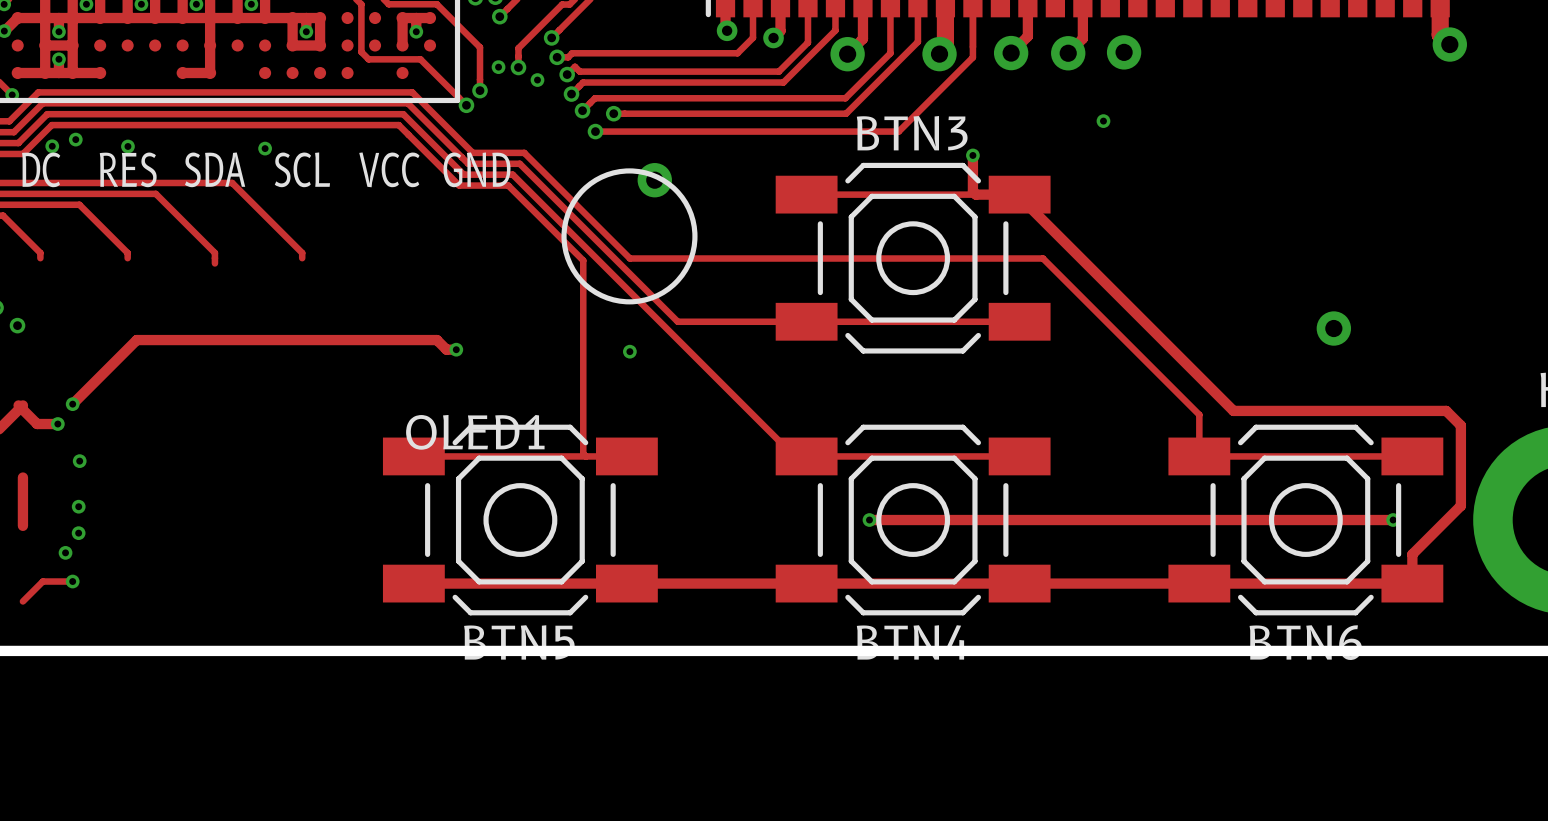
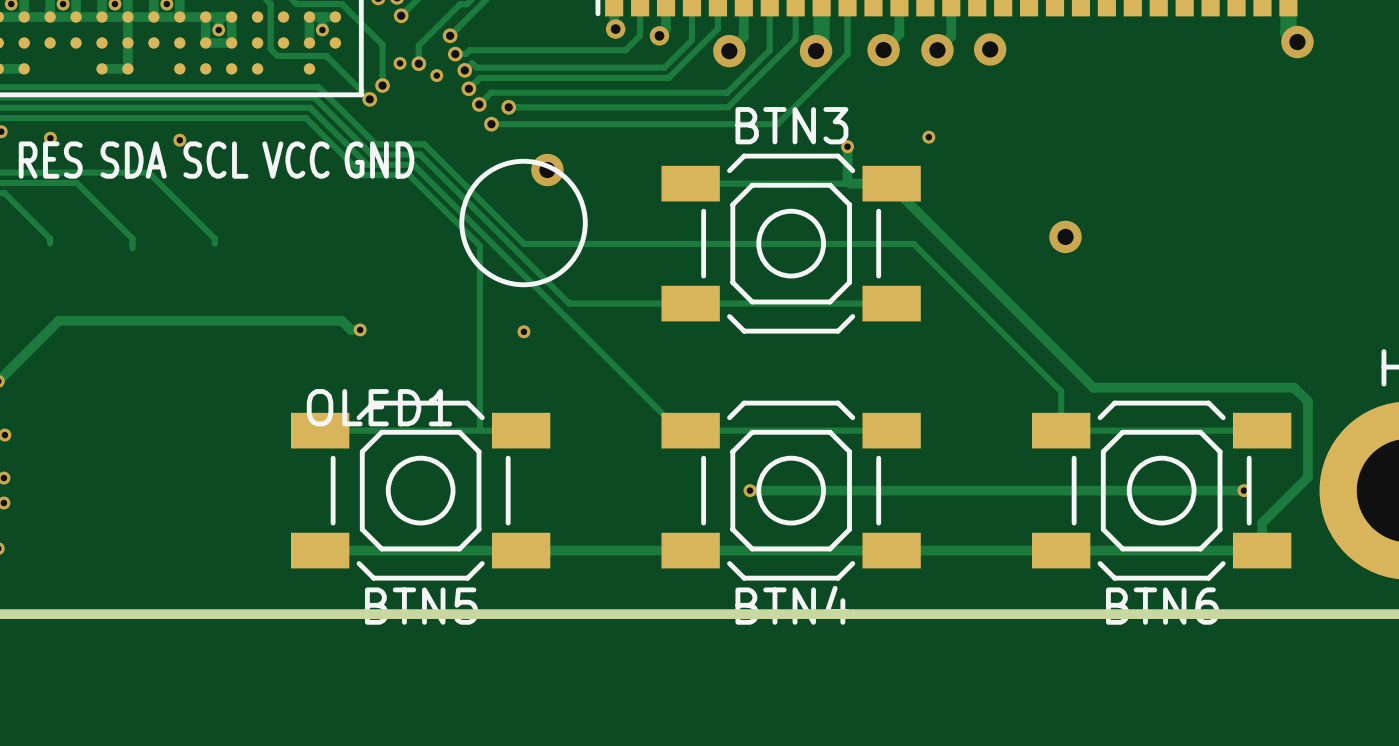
via position: (1103, 121) -> (928, 137)
via position: (1333, 328) -> (1065, 236)

